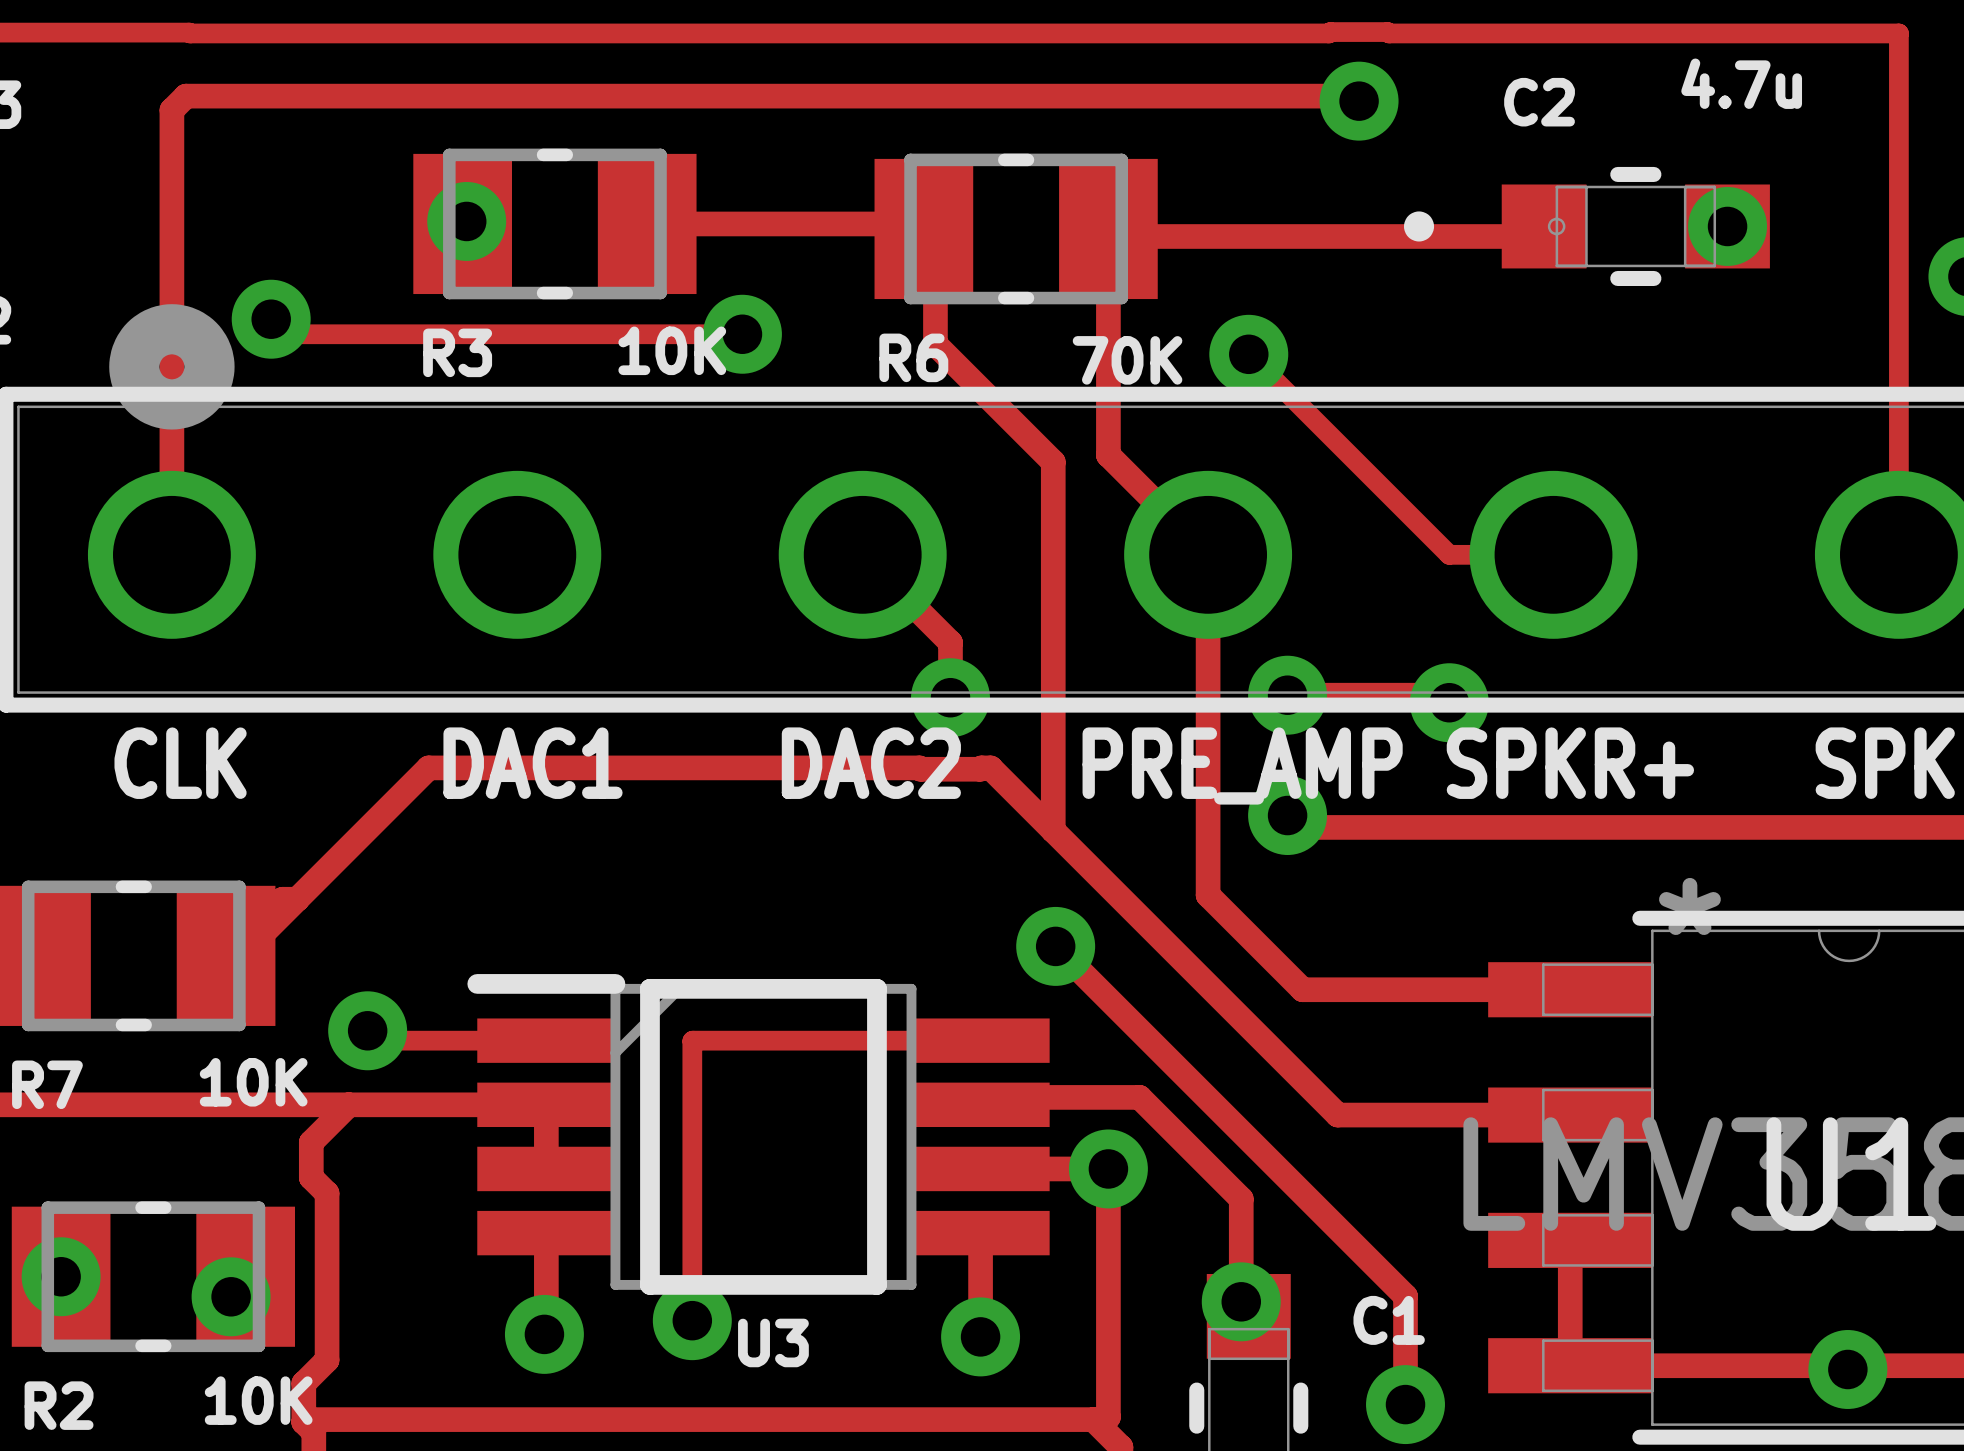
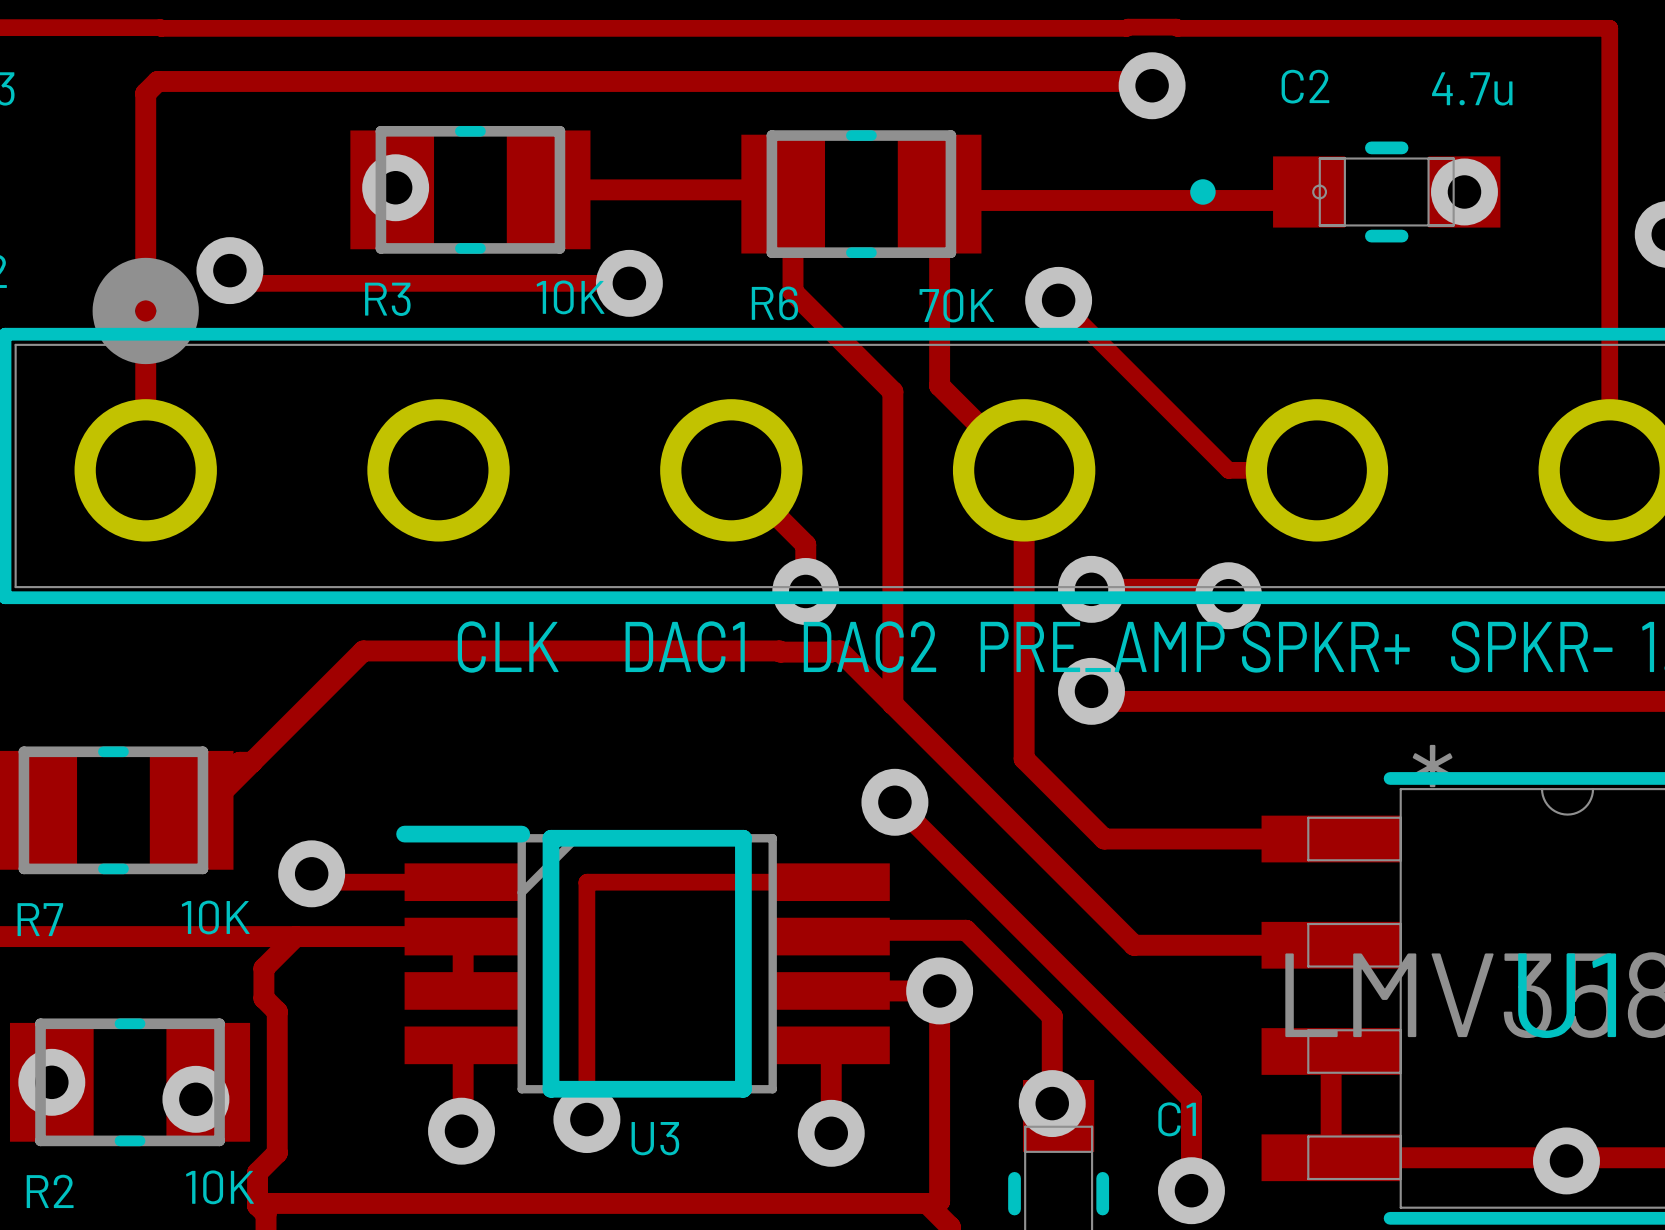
C2 value position: 4.7u (1741, 83) -> 4.7u (1472, 88)

